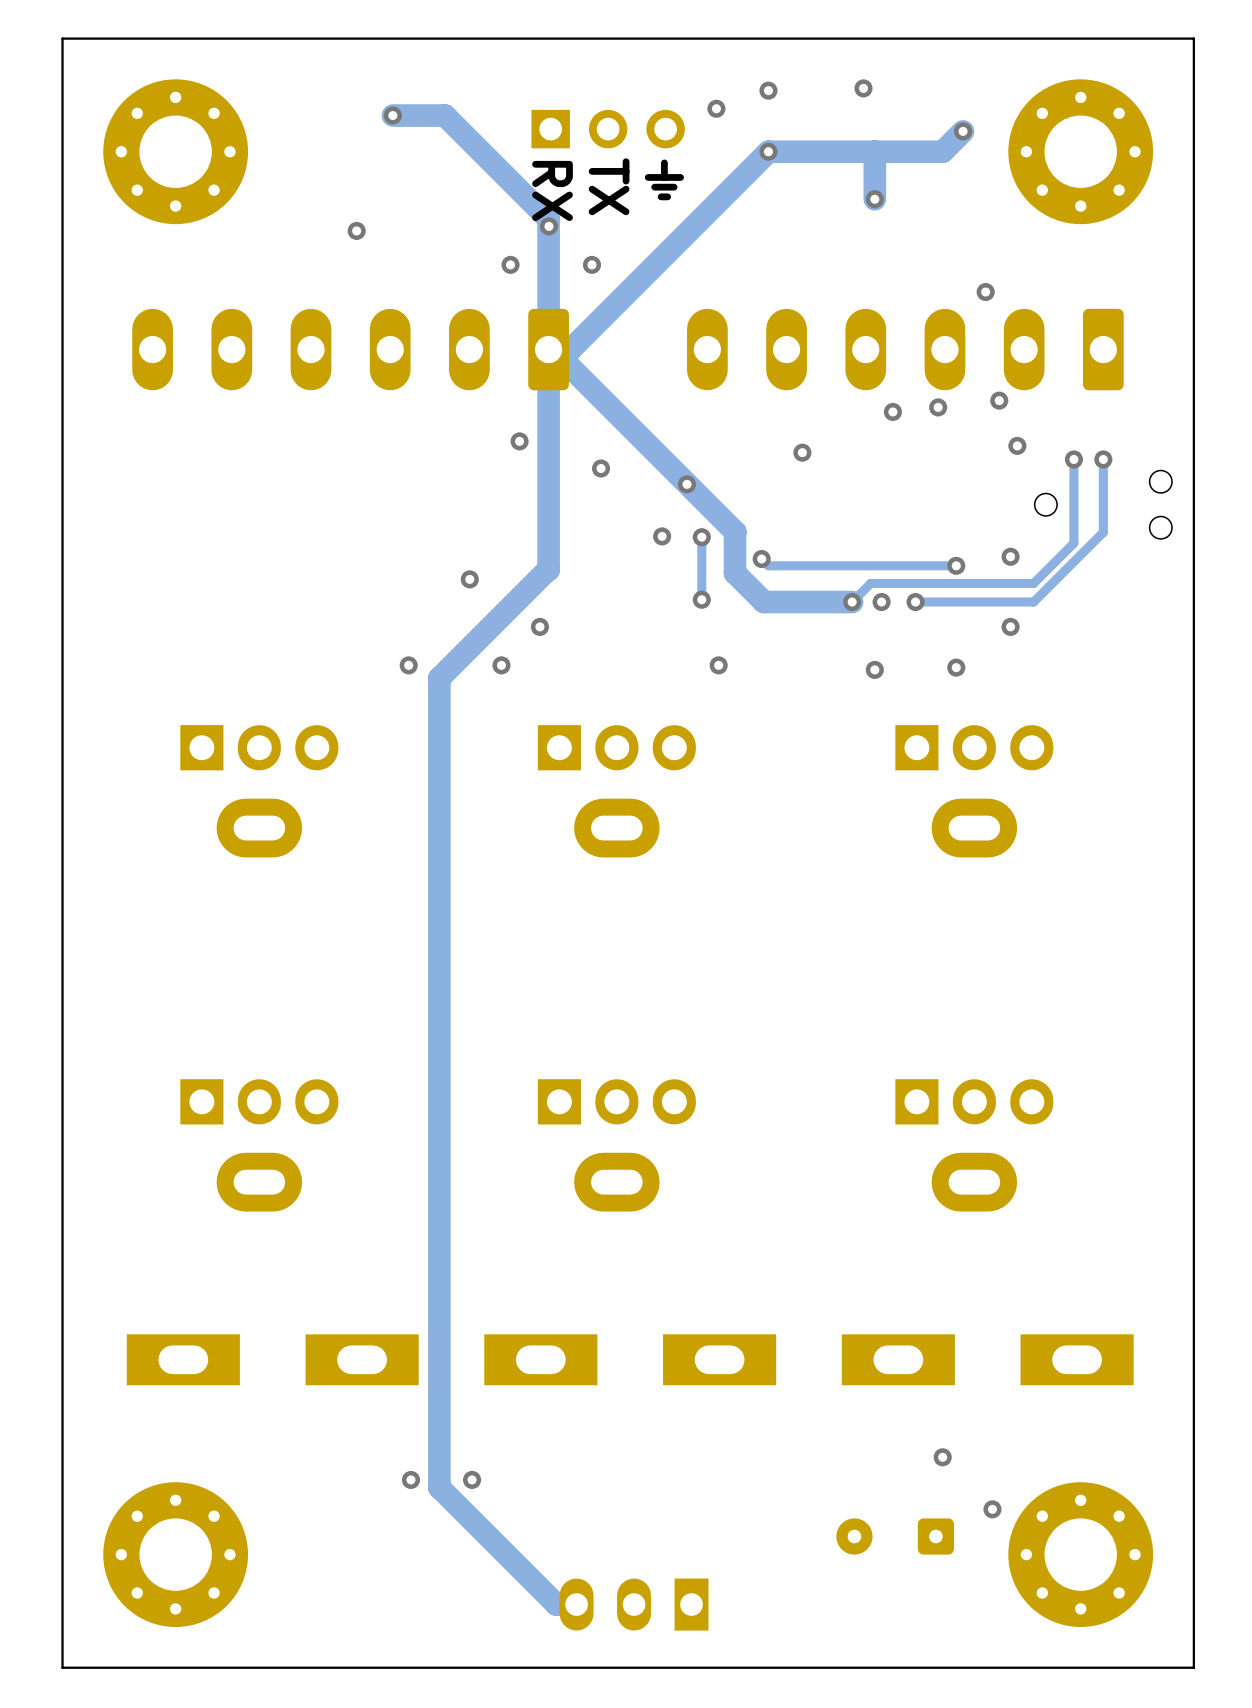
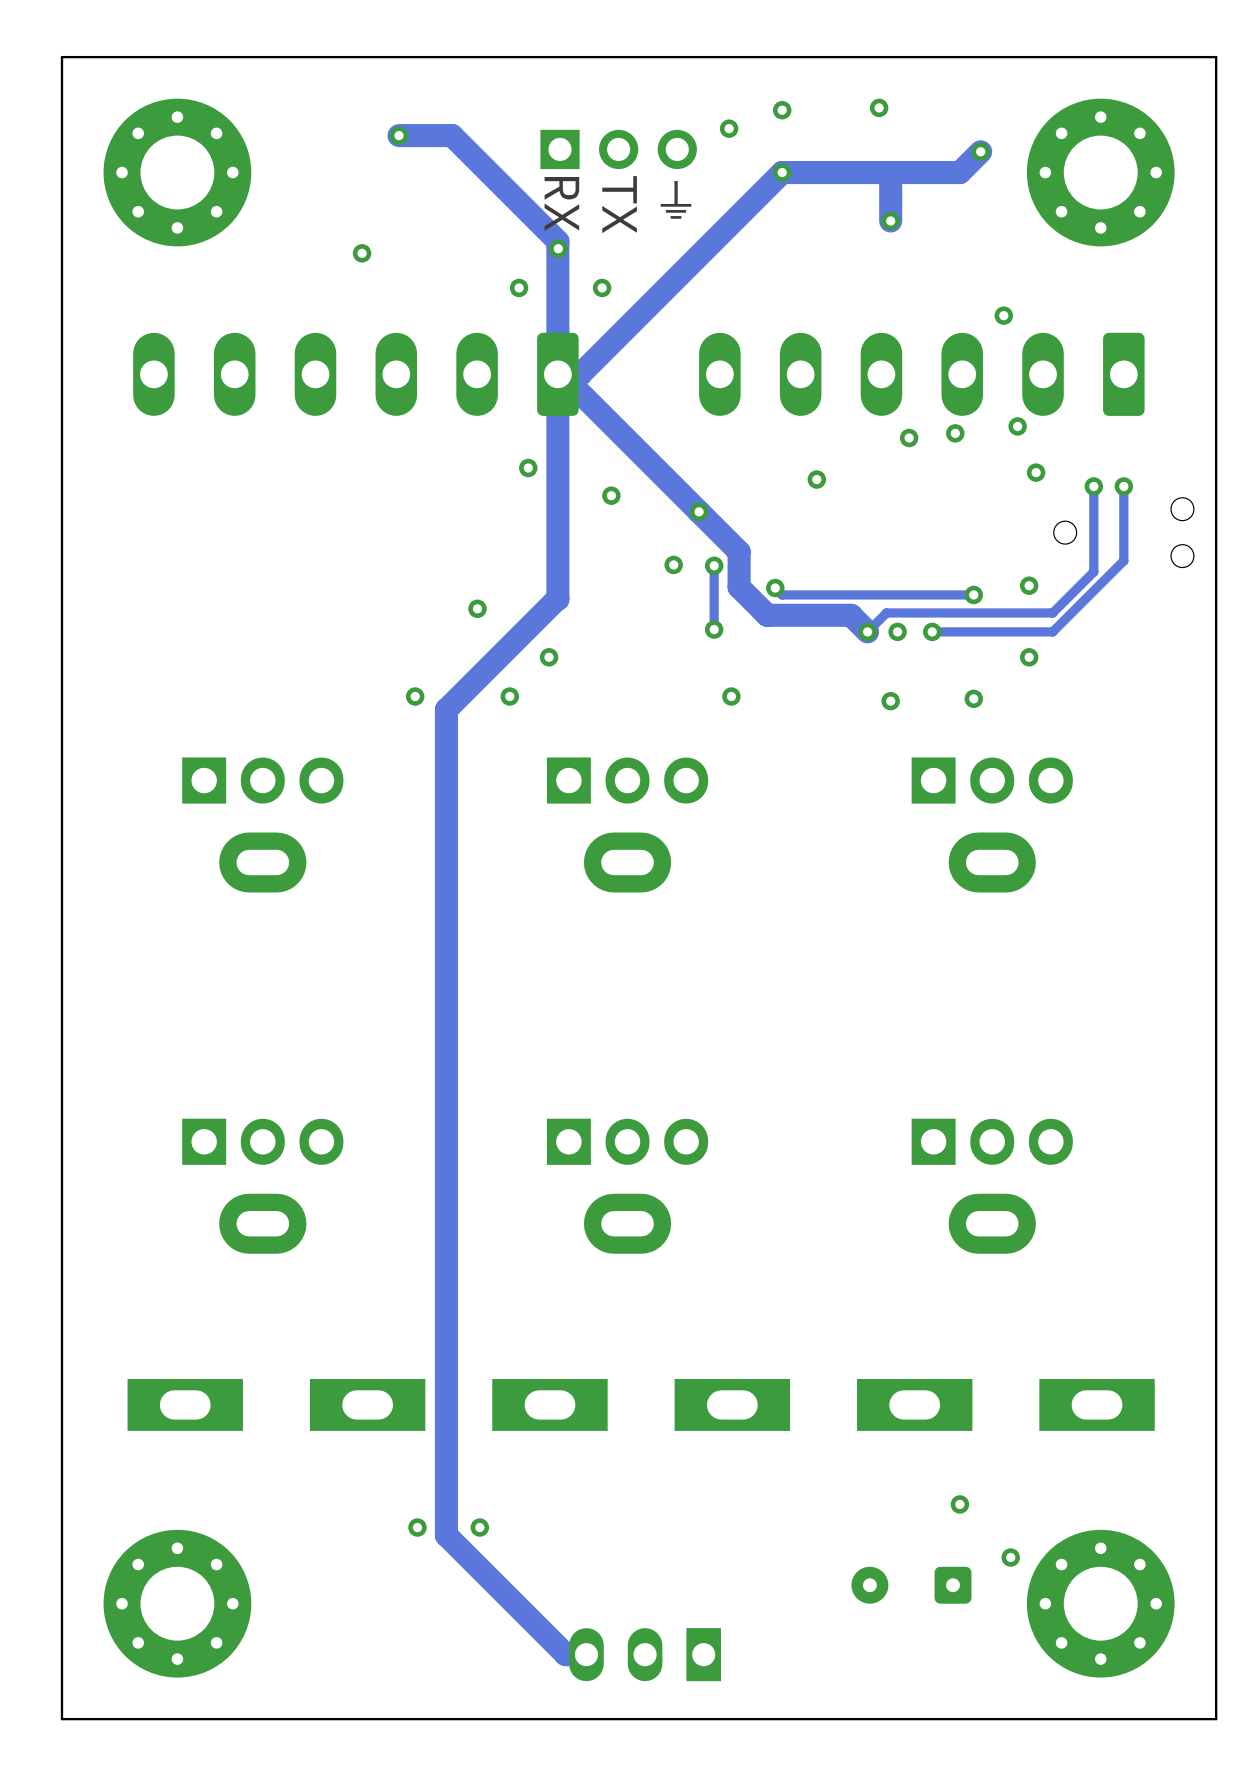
track: (552, 349) (735, 531) -> (561, 374) (739, 551) (739, 587) (767, 615) (850, 615) (867, 631)
track: (734, 532) (734, 573) (763, 602) (852, 602) -> none

